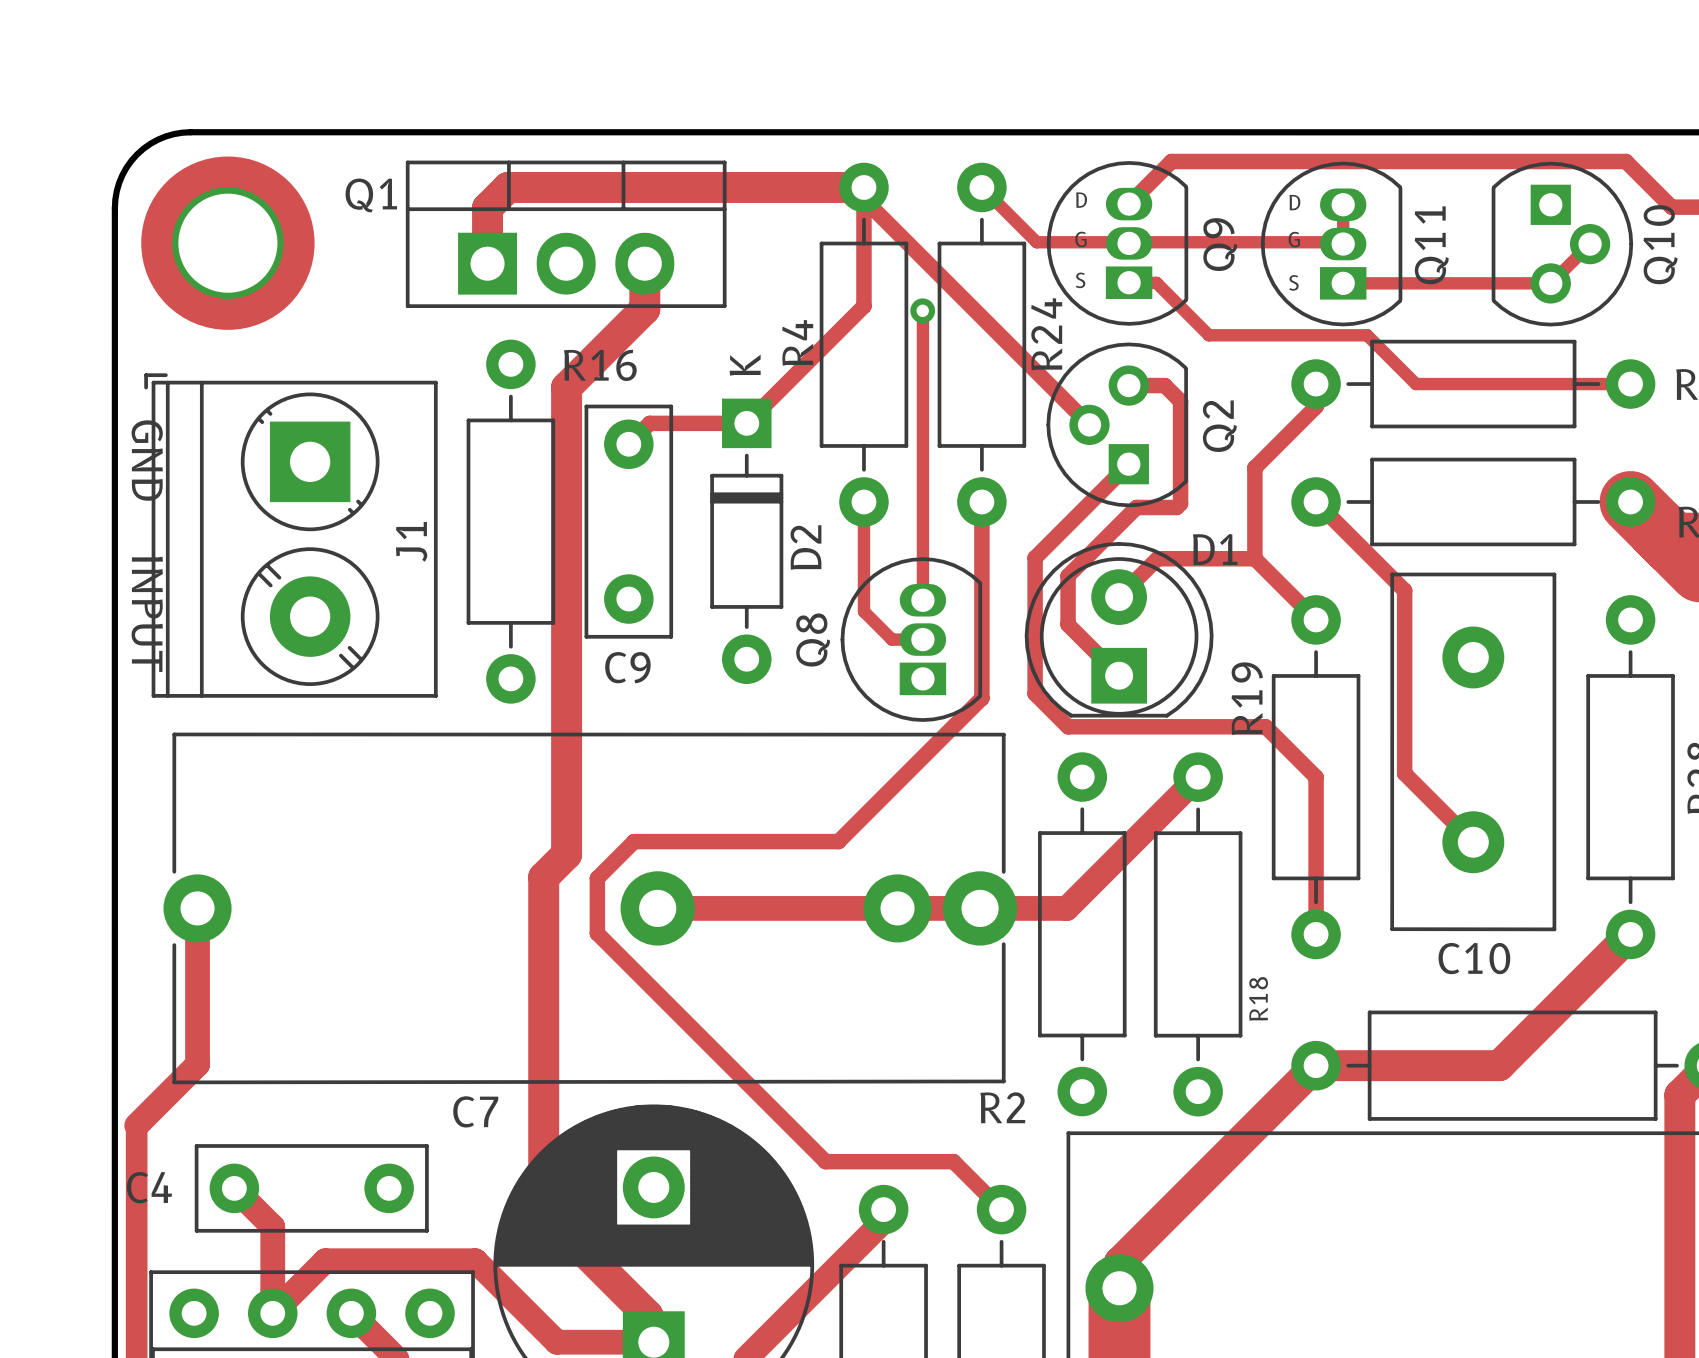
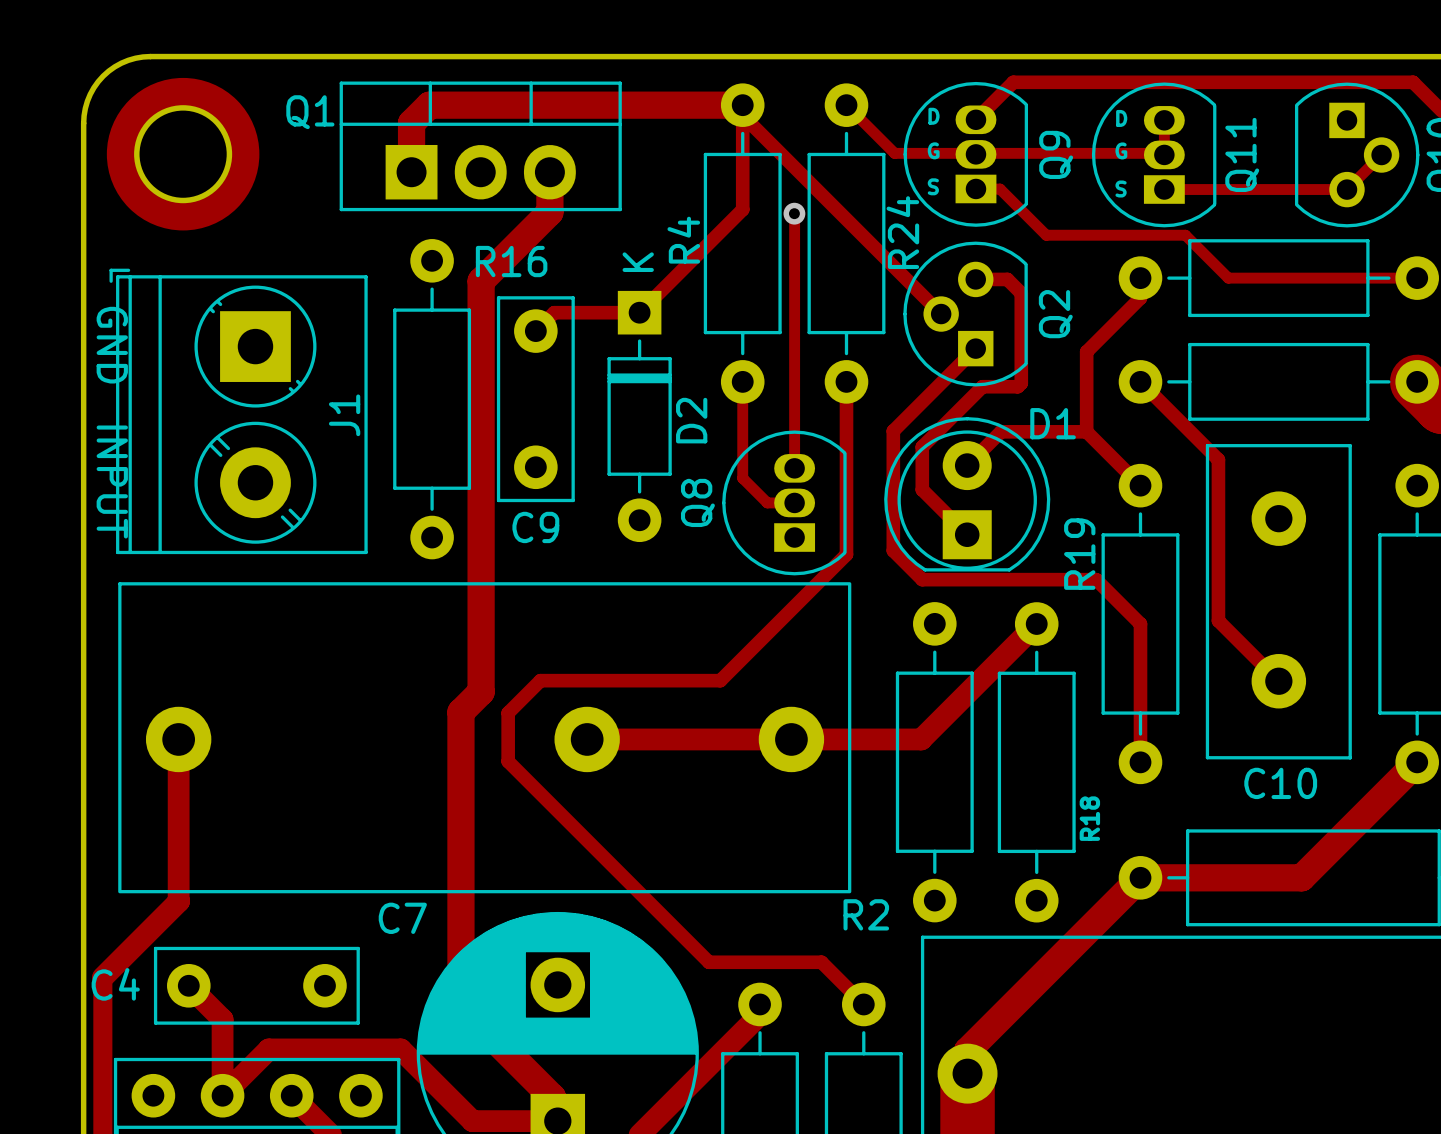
C7 footprint: [163, 732, 1018, 1085] -> [118, 582, 852, 894]
track: (197, 908) (197, 1064) (136, 1125) (136, 1179) -> (178, 739) (179, 901) (102, 977)

